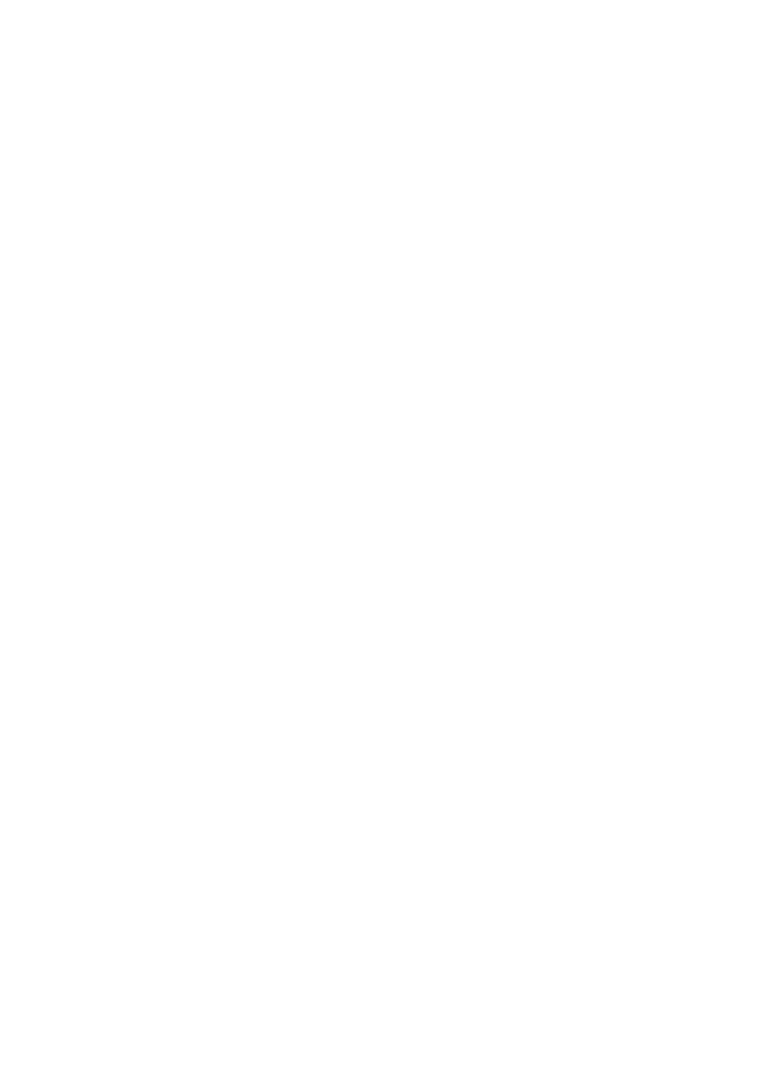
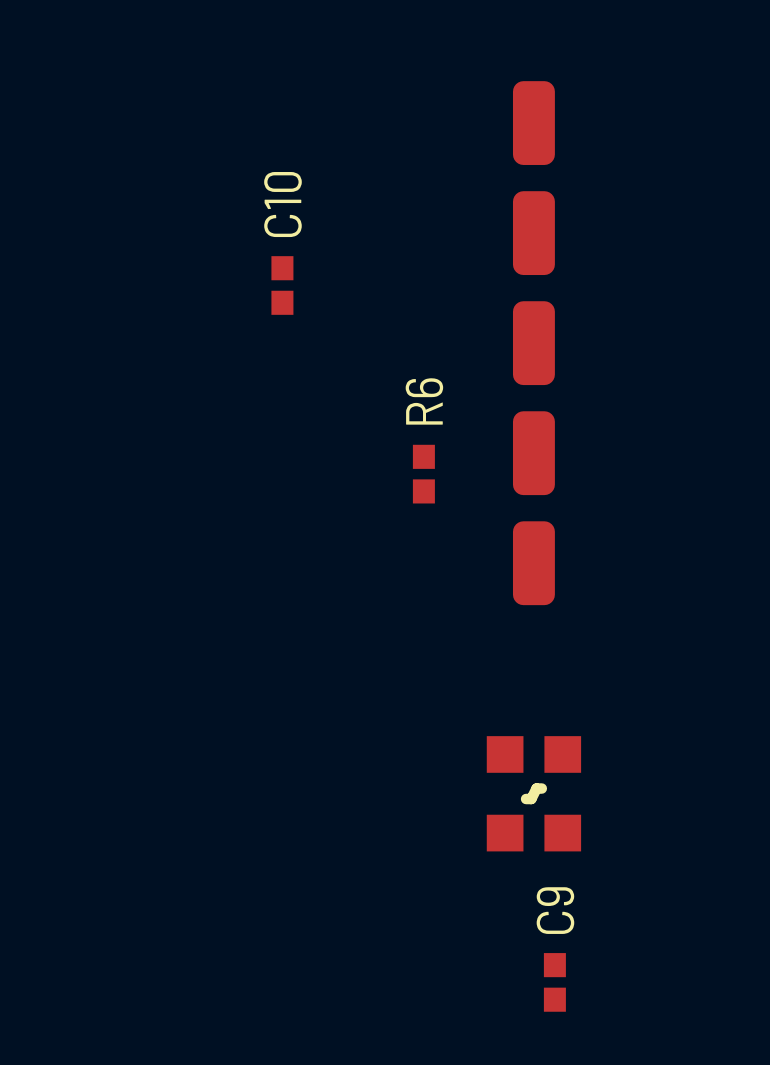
part: none -> (533, 123)
part: none -> (533, 233)
C10: none -> (282, 285)
part: none -> (533, 343)
part: none -> (533, 453)
R6: none -> (423, 474)
part: none -> (533, 563)
part: none -> (533, 793)
C9: none -> (554, 982)

